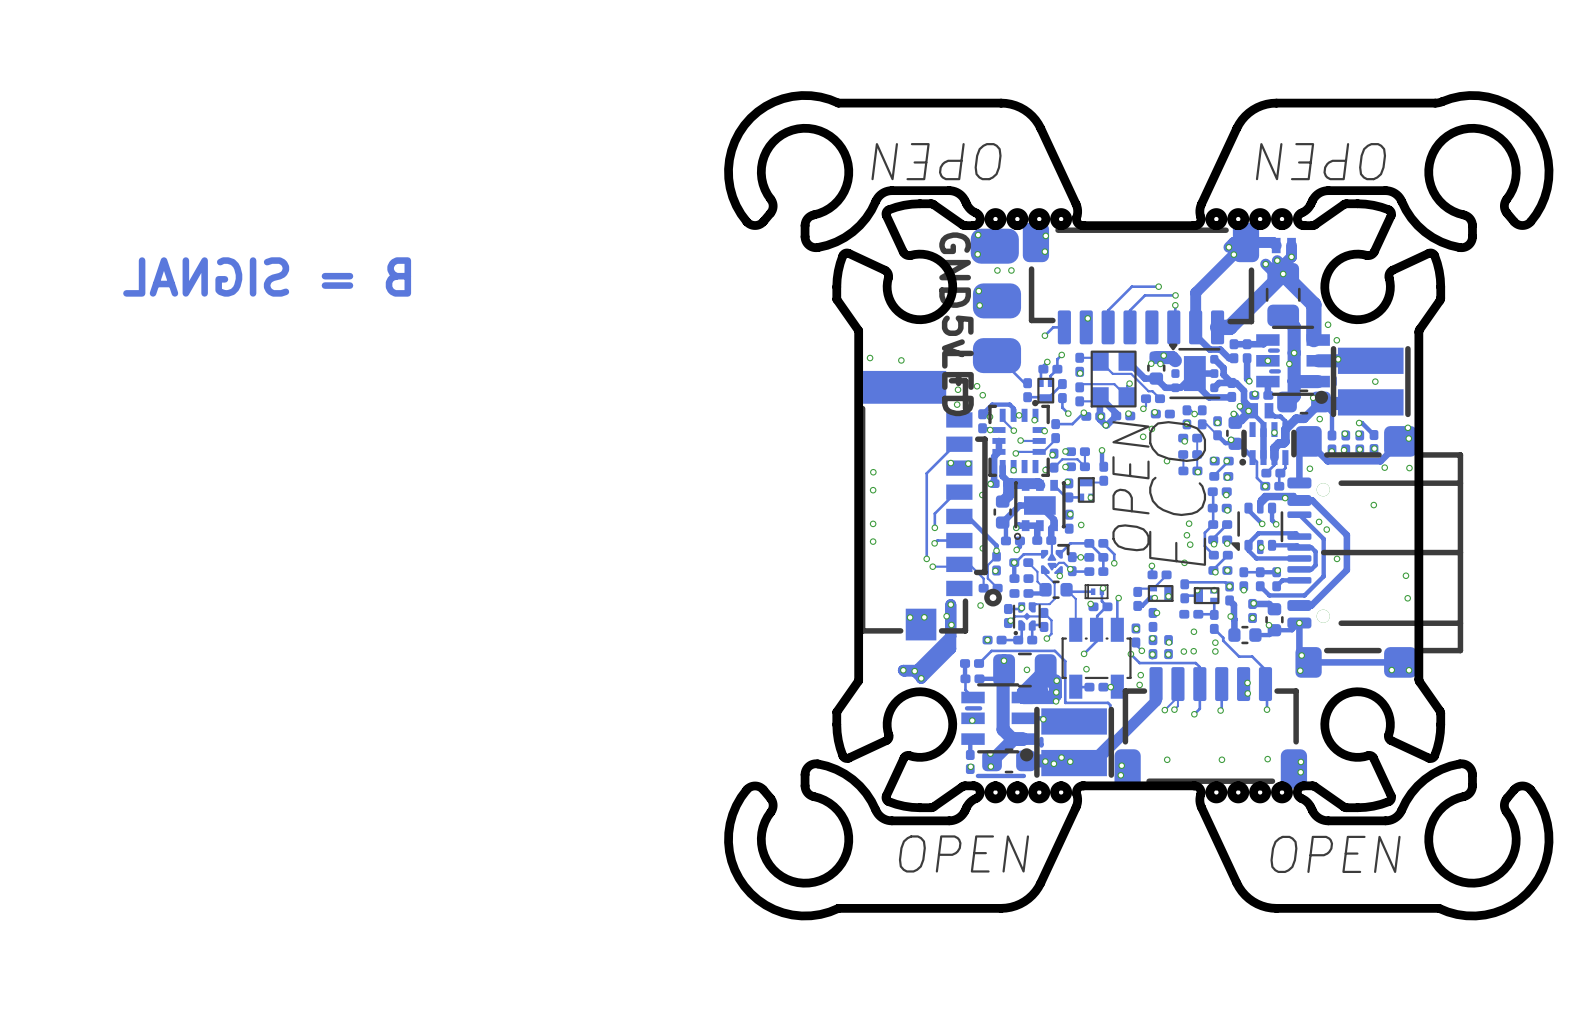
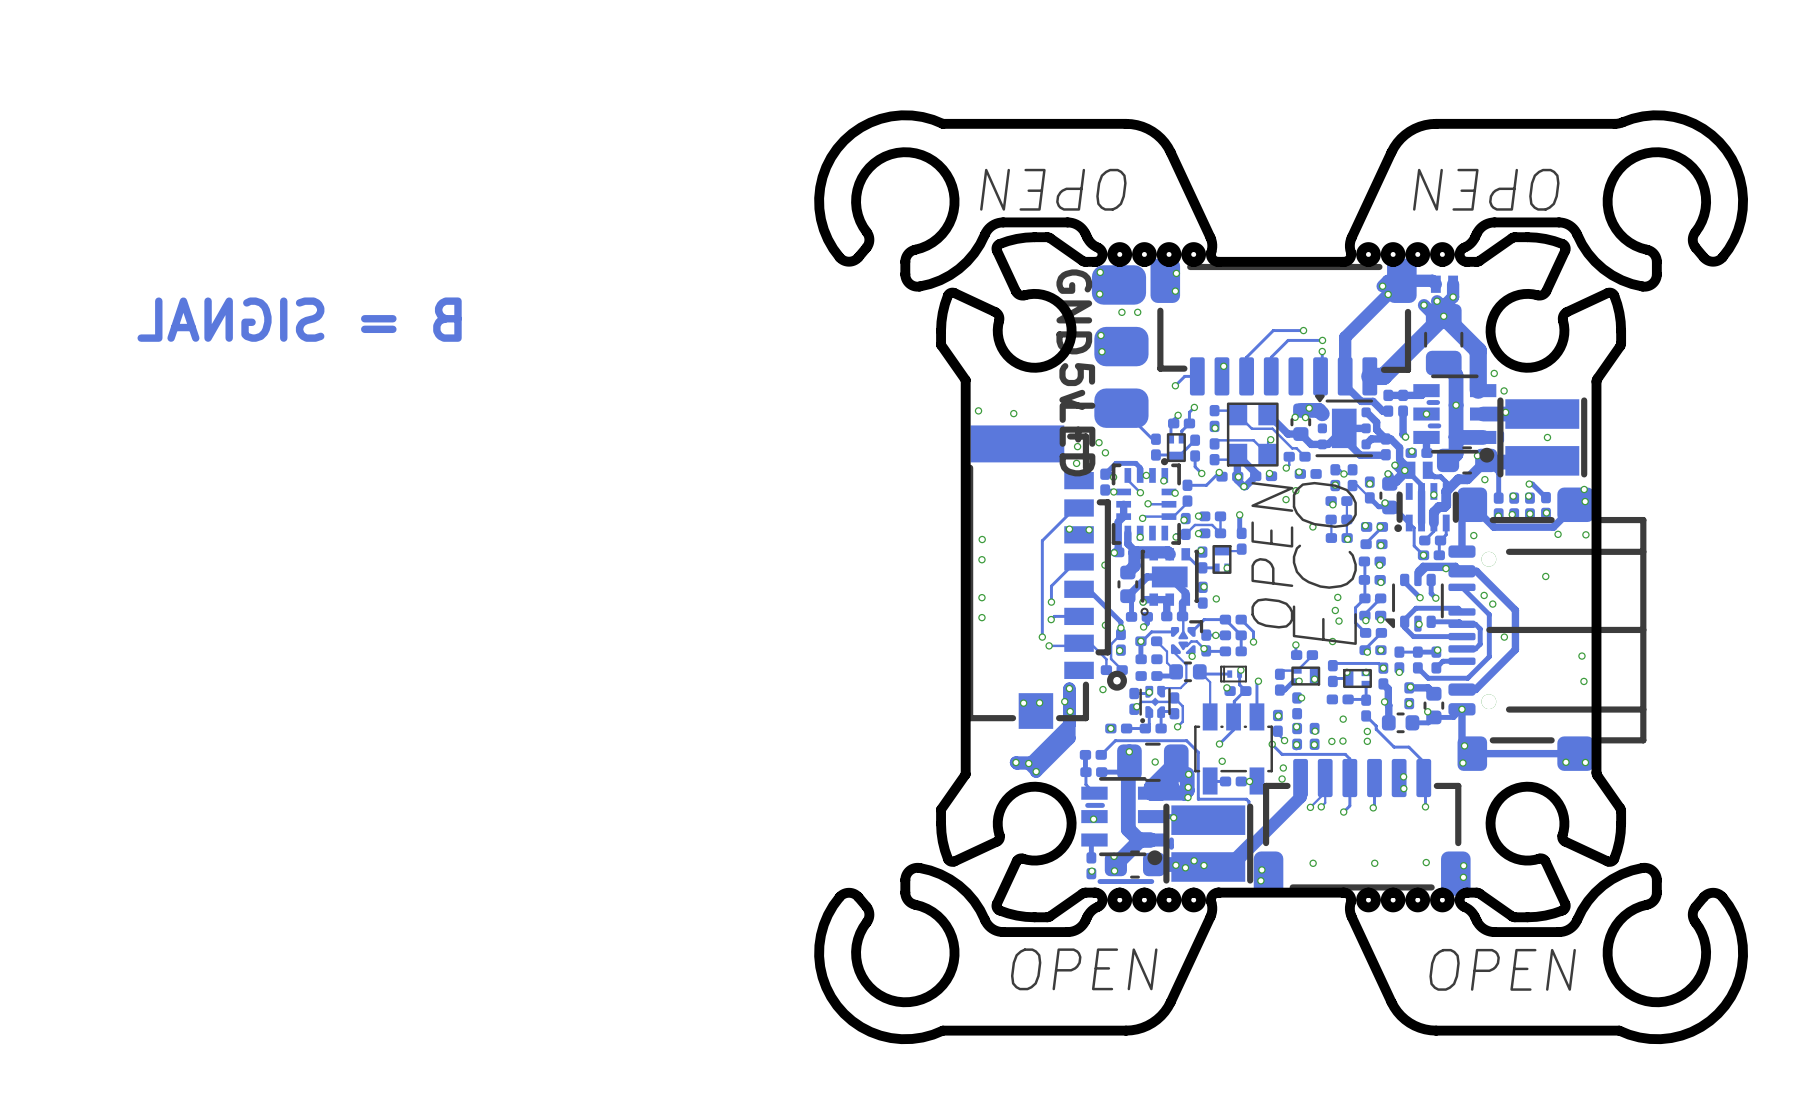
via: (1289, 363) -> none

